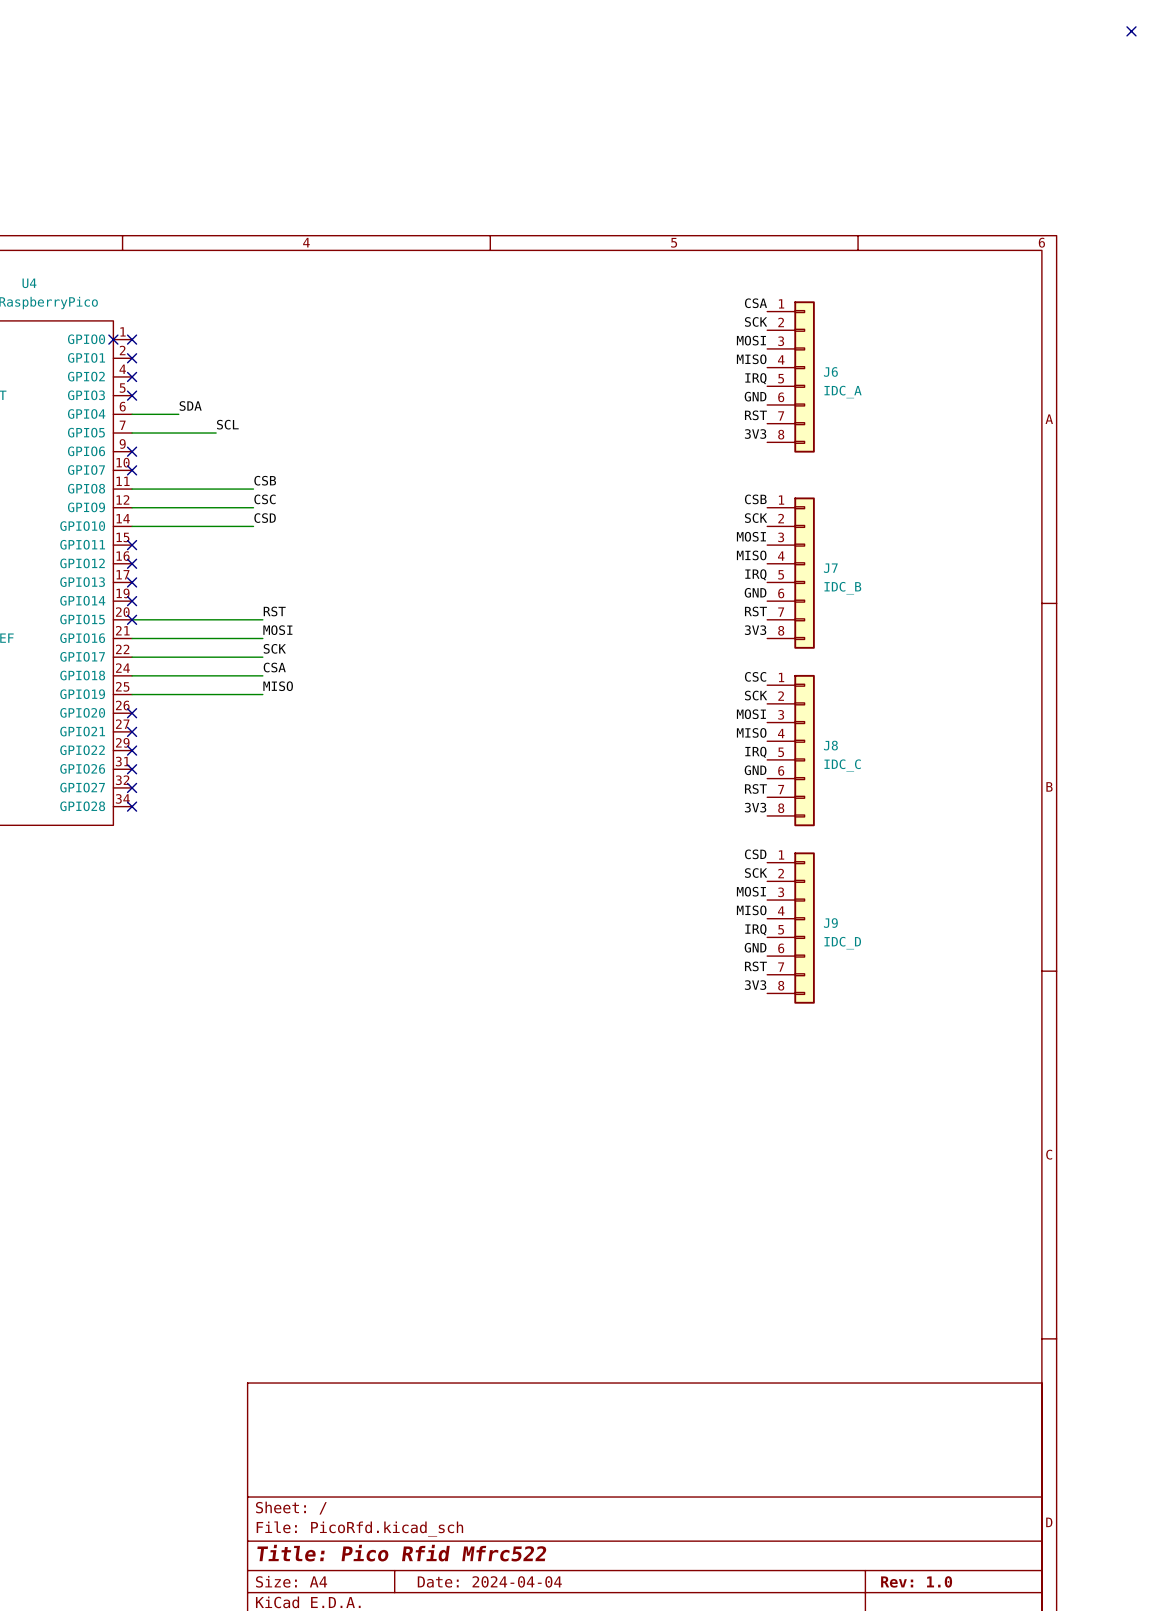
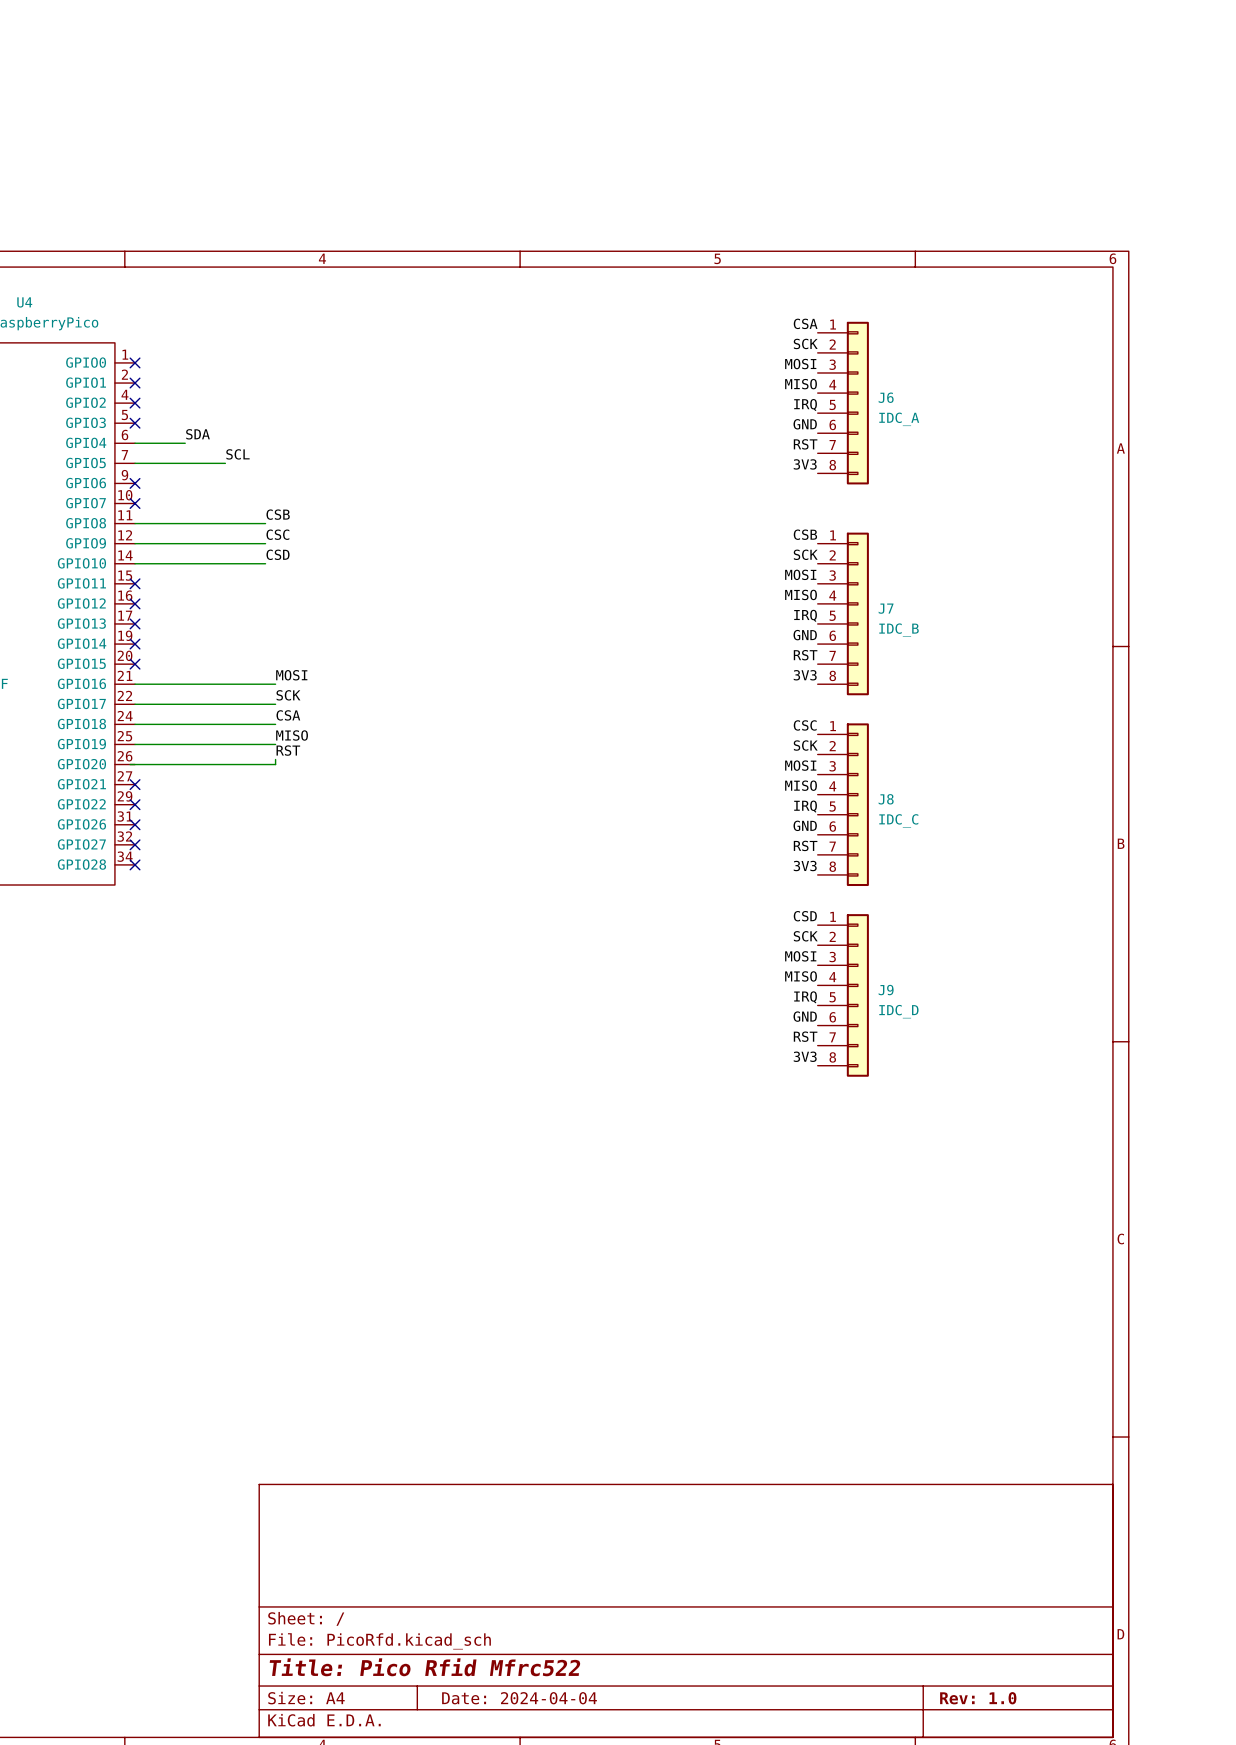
no-connect mark: (1131, 31) -> none
no-connect mark: (113, 339) -> none
label position: RST (274, 611) -> RST (288, 750)
wire: (132, 619) (262, 619) -> none
wire: none -> (275, 759) (275, 764) (130, 764)
no-connect mark: (132, 713) -> none

